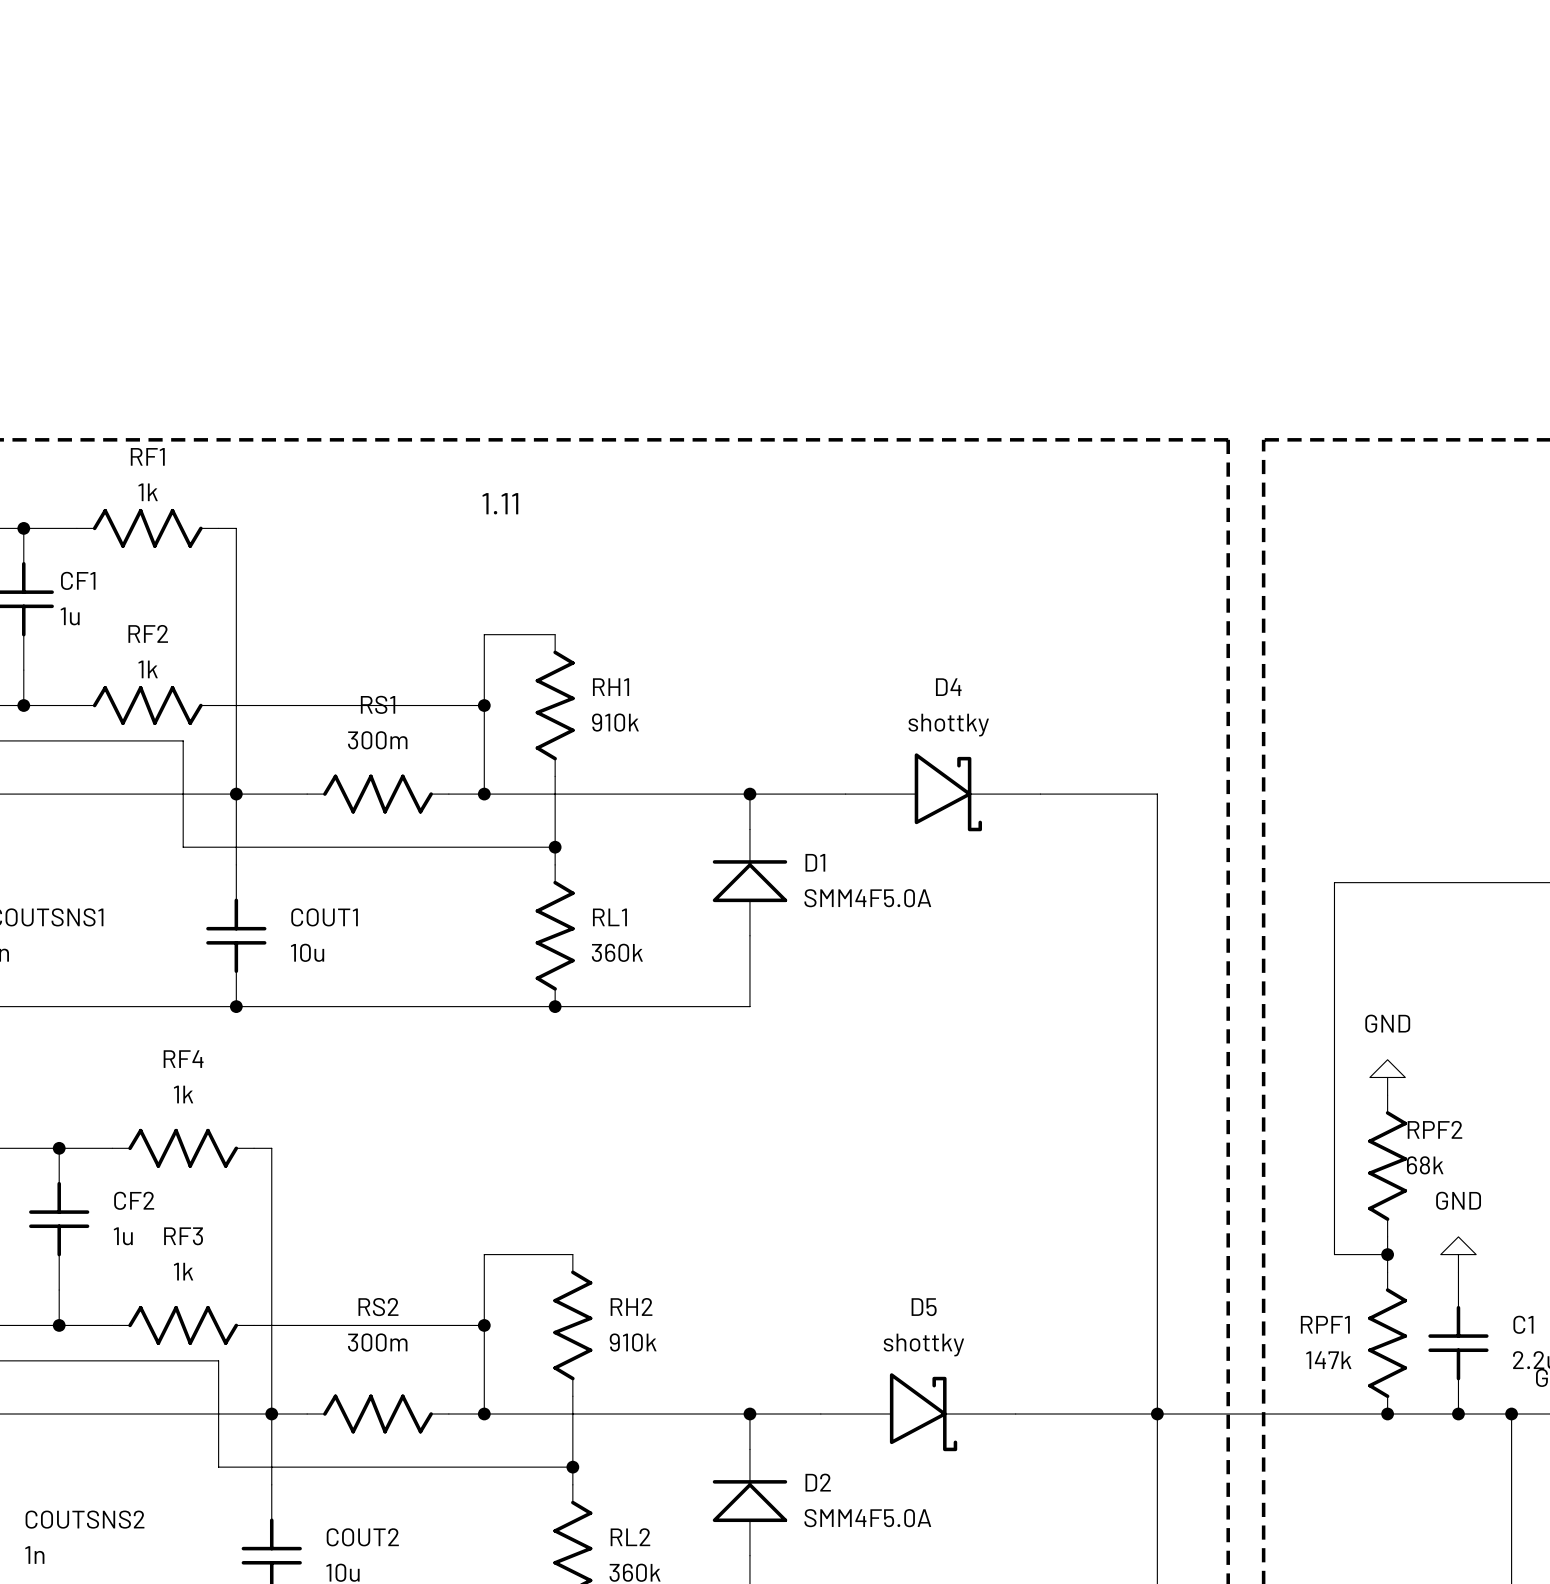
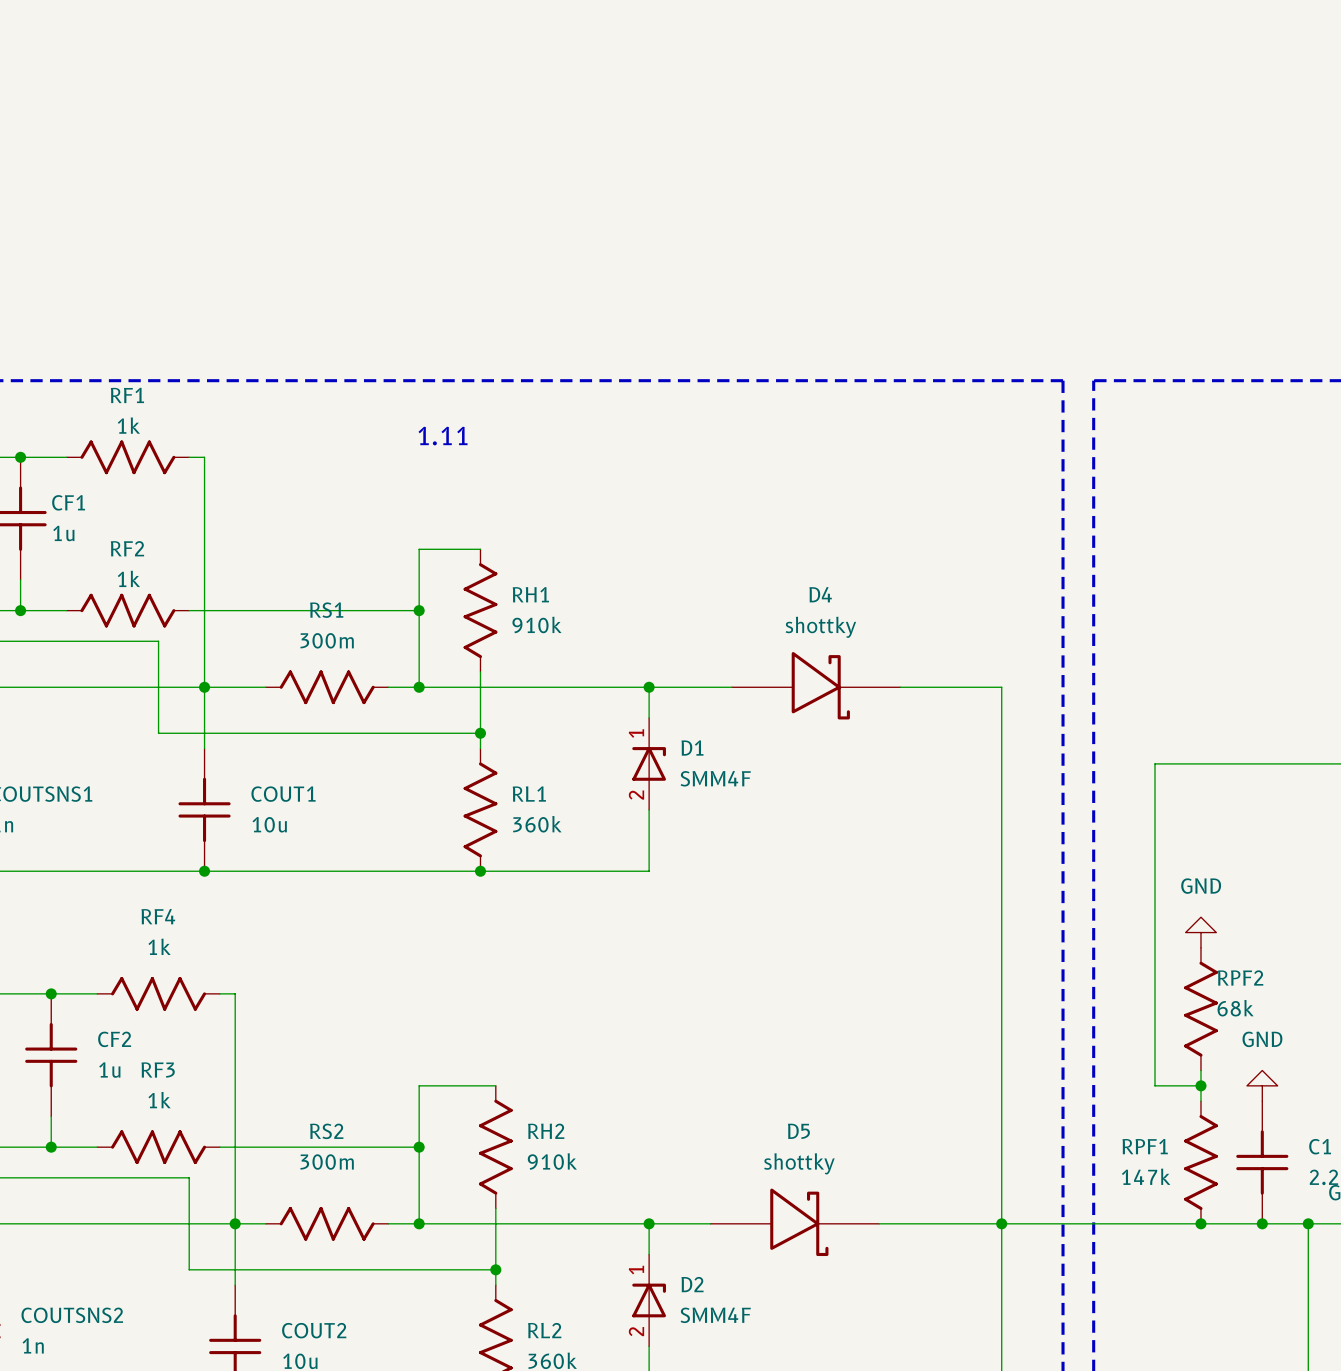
D1 symbol: [712, 829, 788, 936] -> [632, 717, 666, 810]
D1 value: SMM4F5.0A (867, 898) -> SMM4F (715, 778)
D2 symbol: [712, 1449, 788, 1556] -> [632, 1254, 666, 1347]
D2 value: SMM4F5.0A (867, 1518) -> SMM4F (715, 1315)

